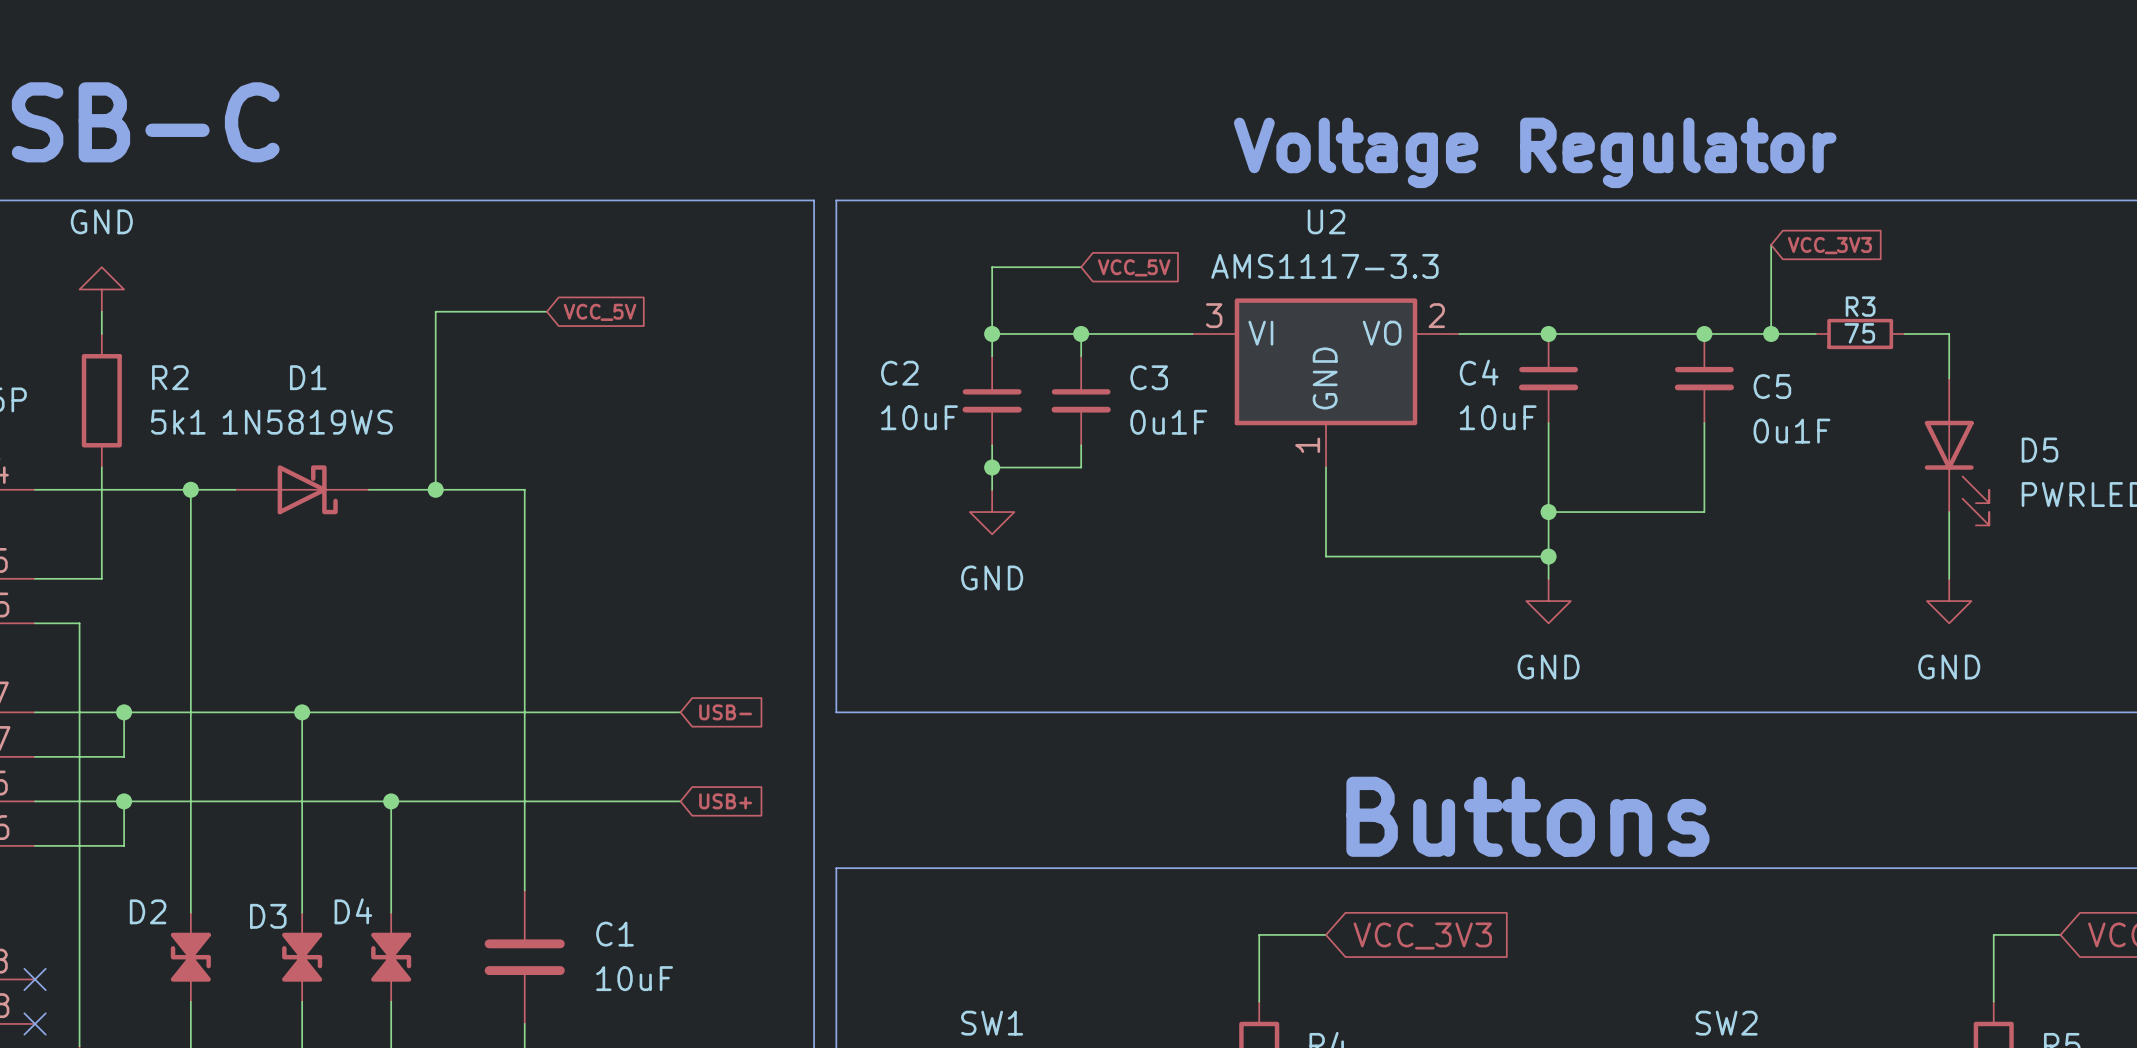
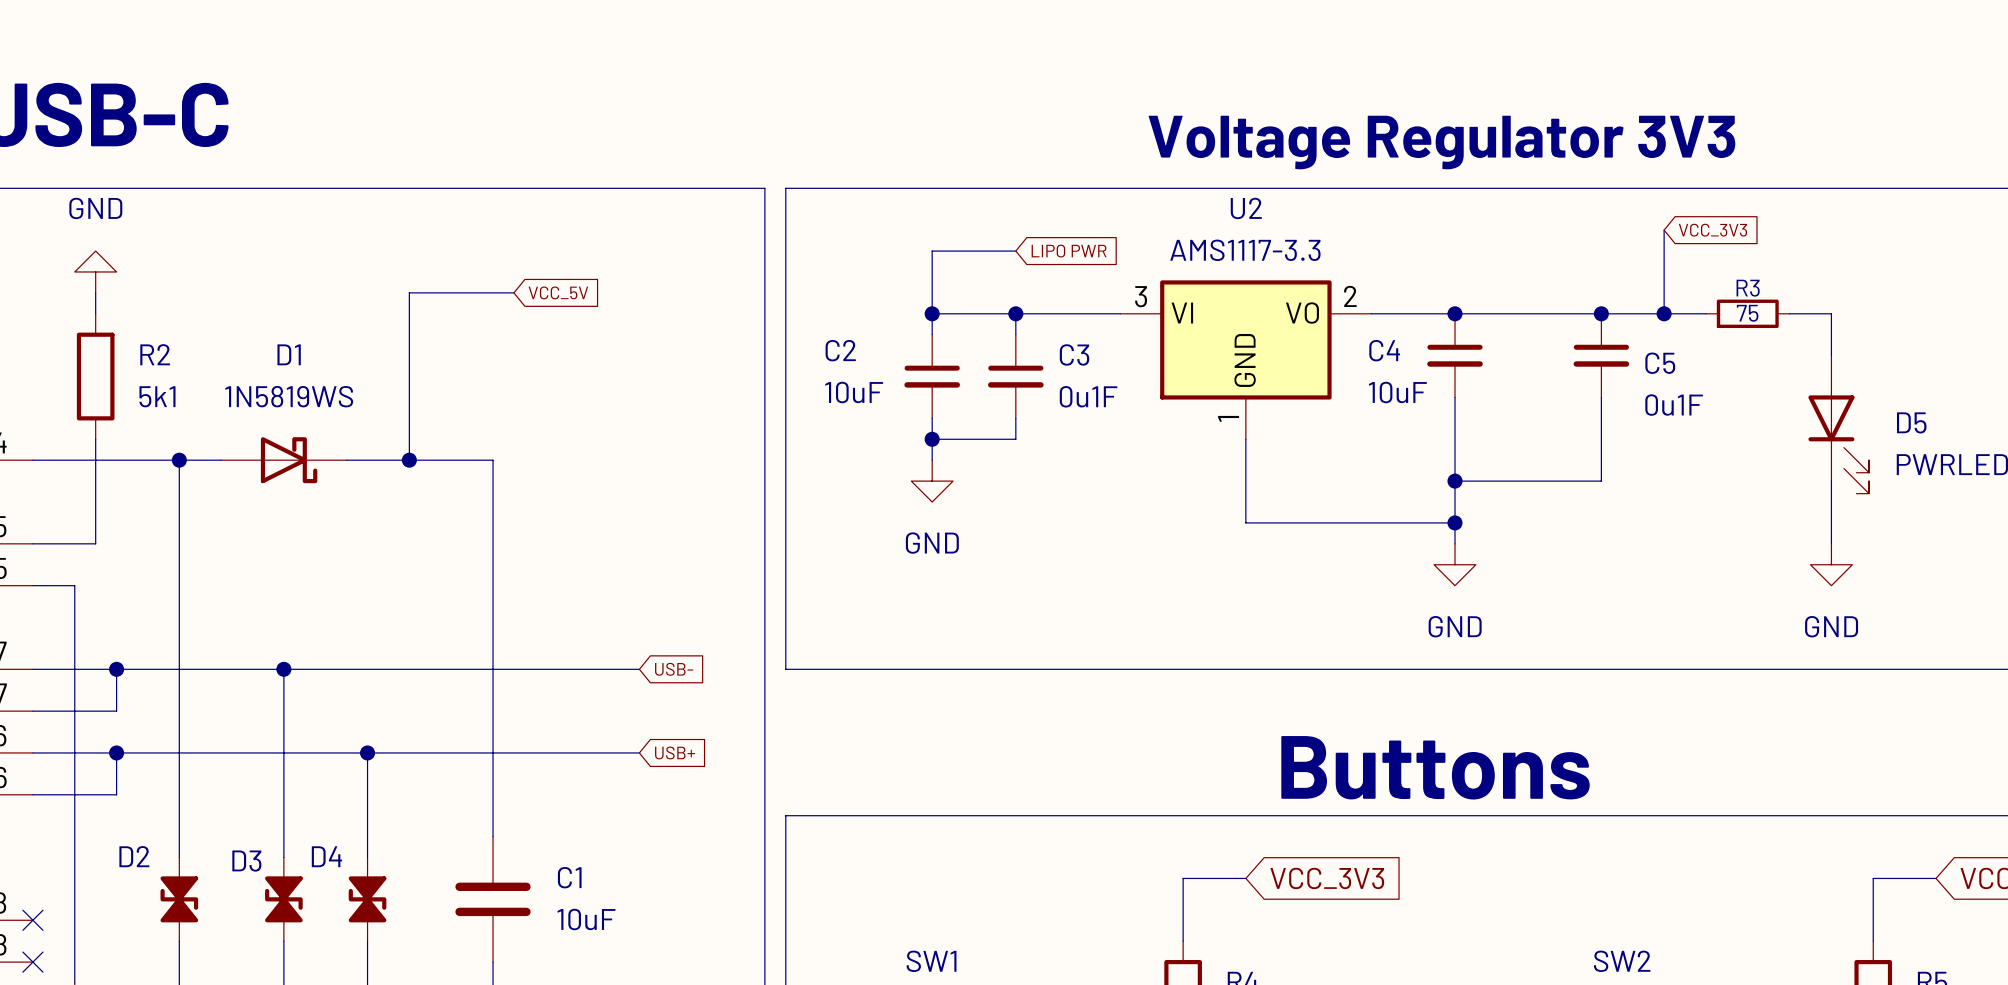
text: Voltage Regulator (1535, 152) -> Voltage Regulator 3V3 (1441, 142)
global label: VCC_5V (1134, 267) -> LIPO PWR (1069, 251)

